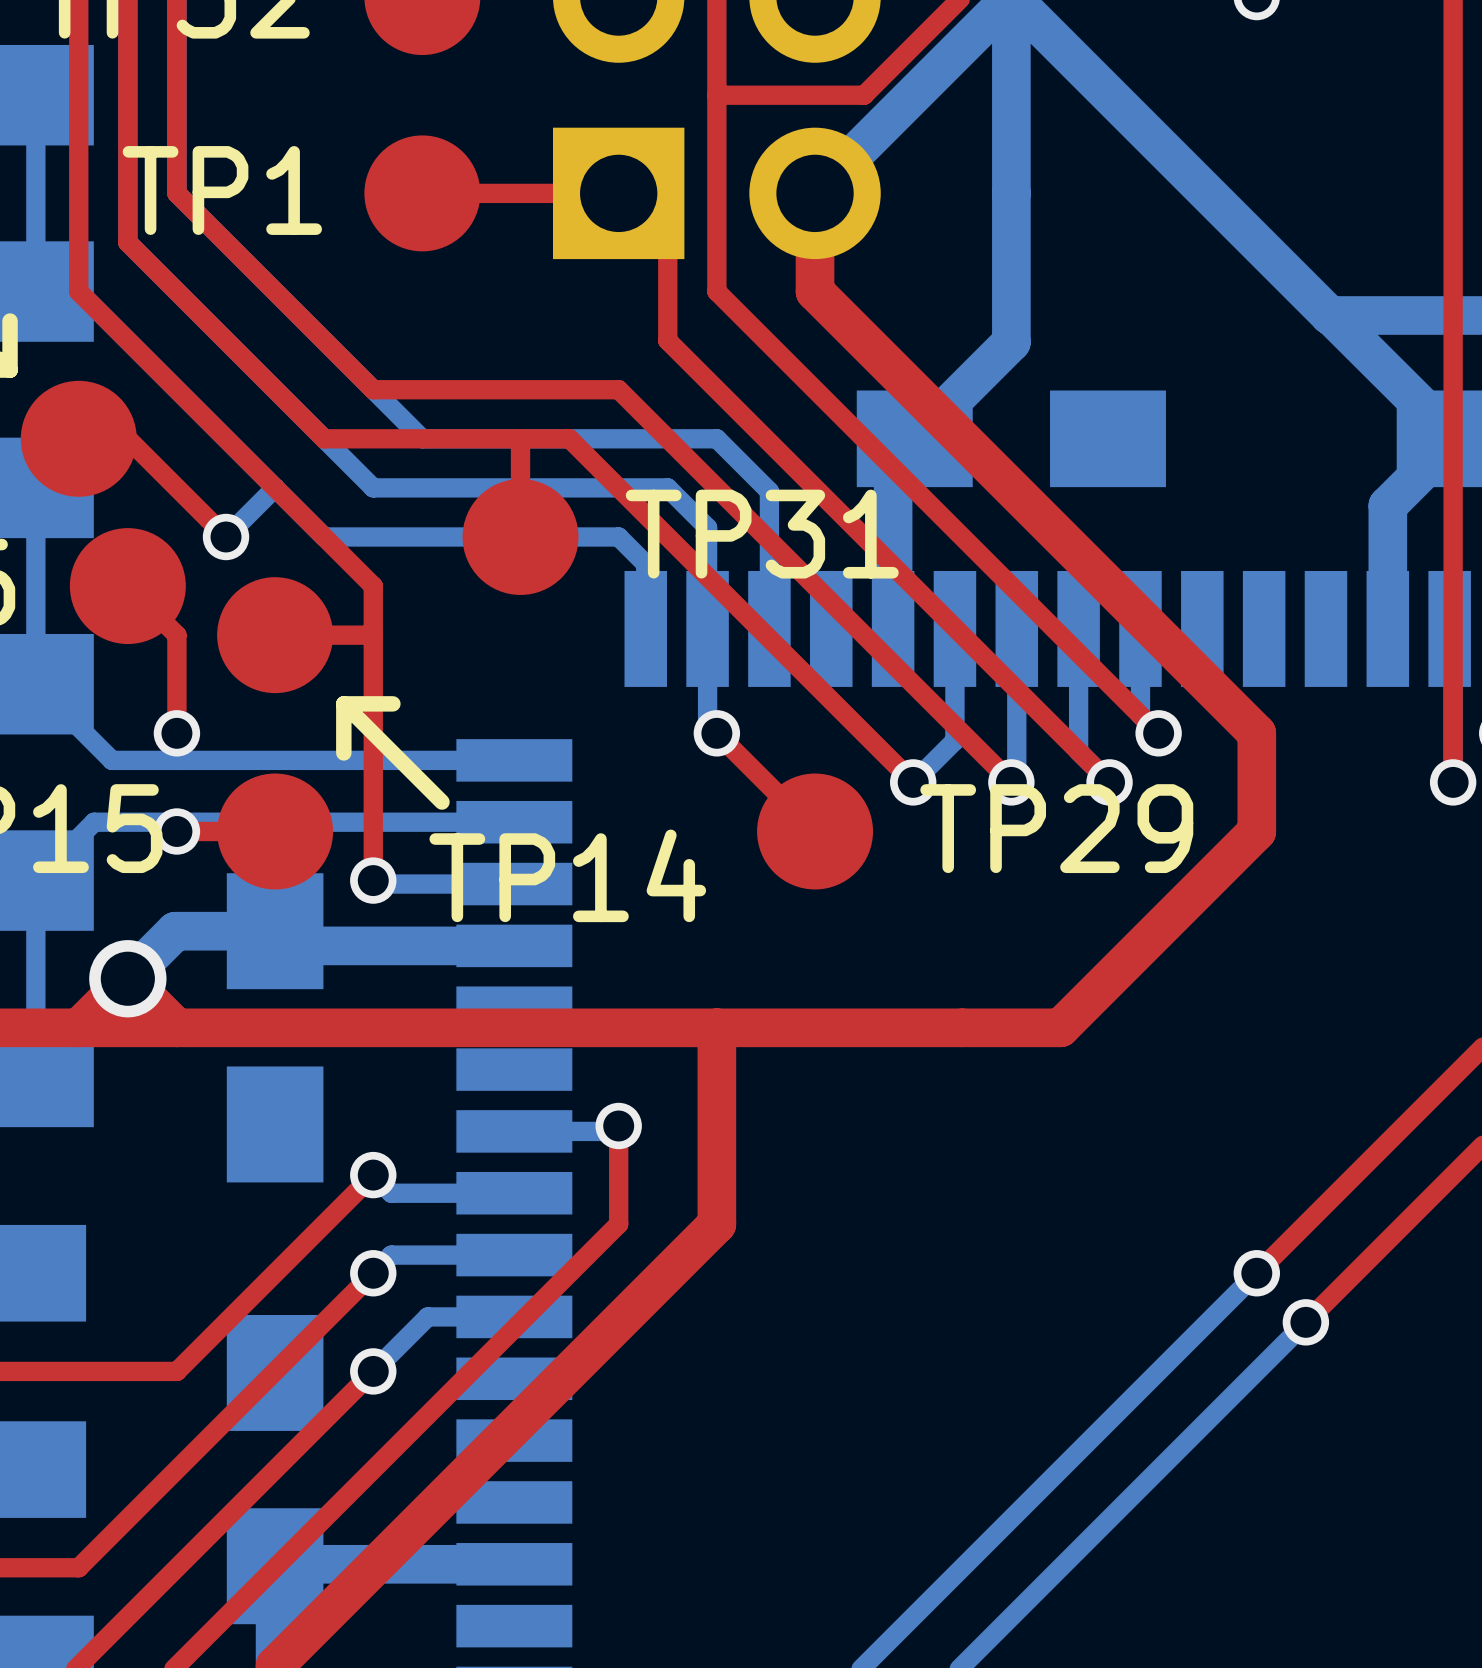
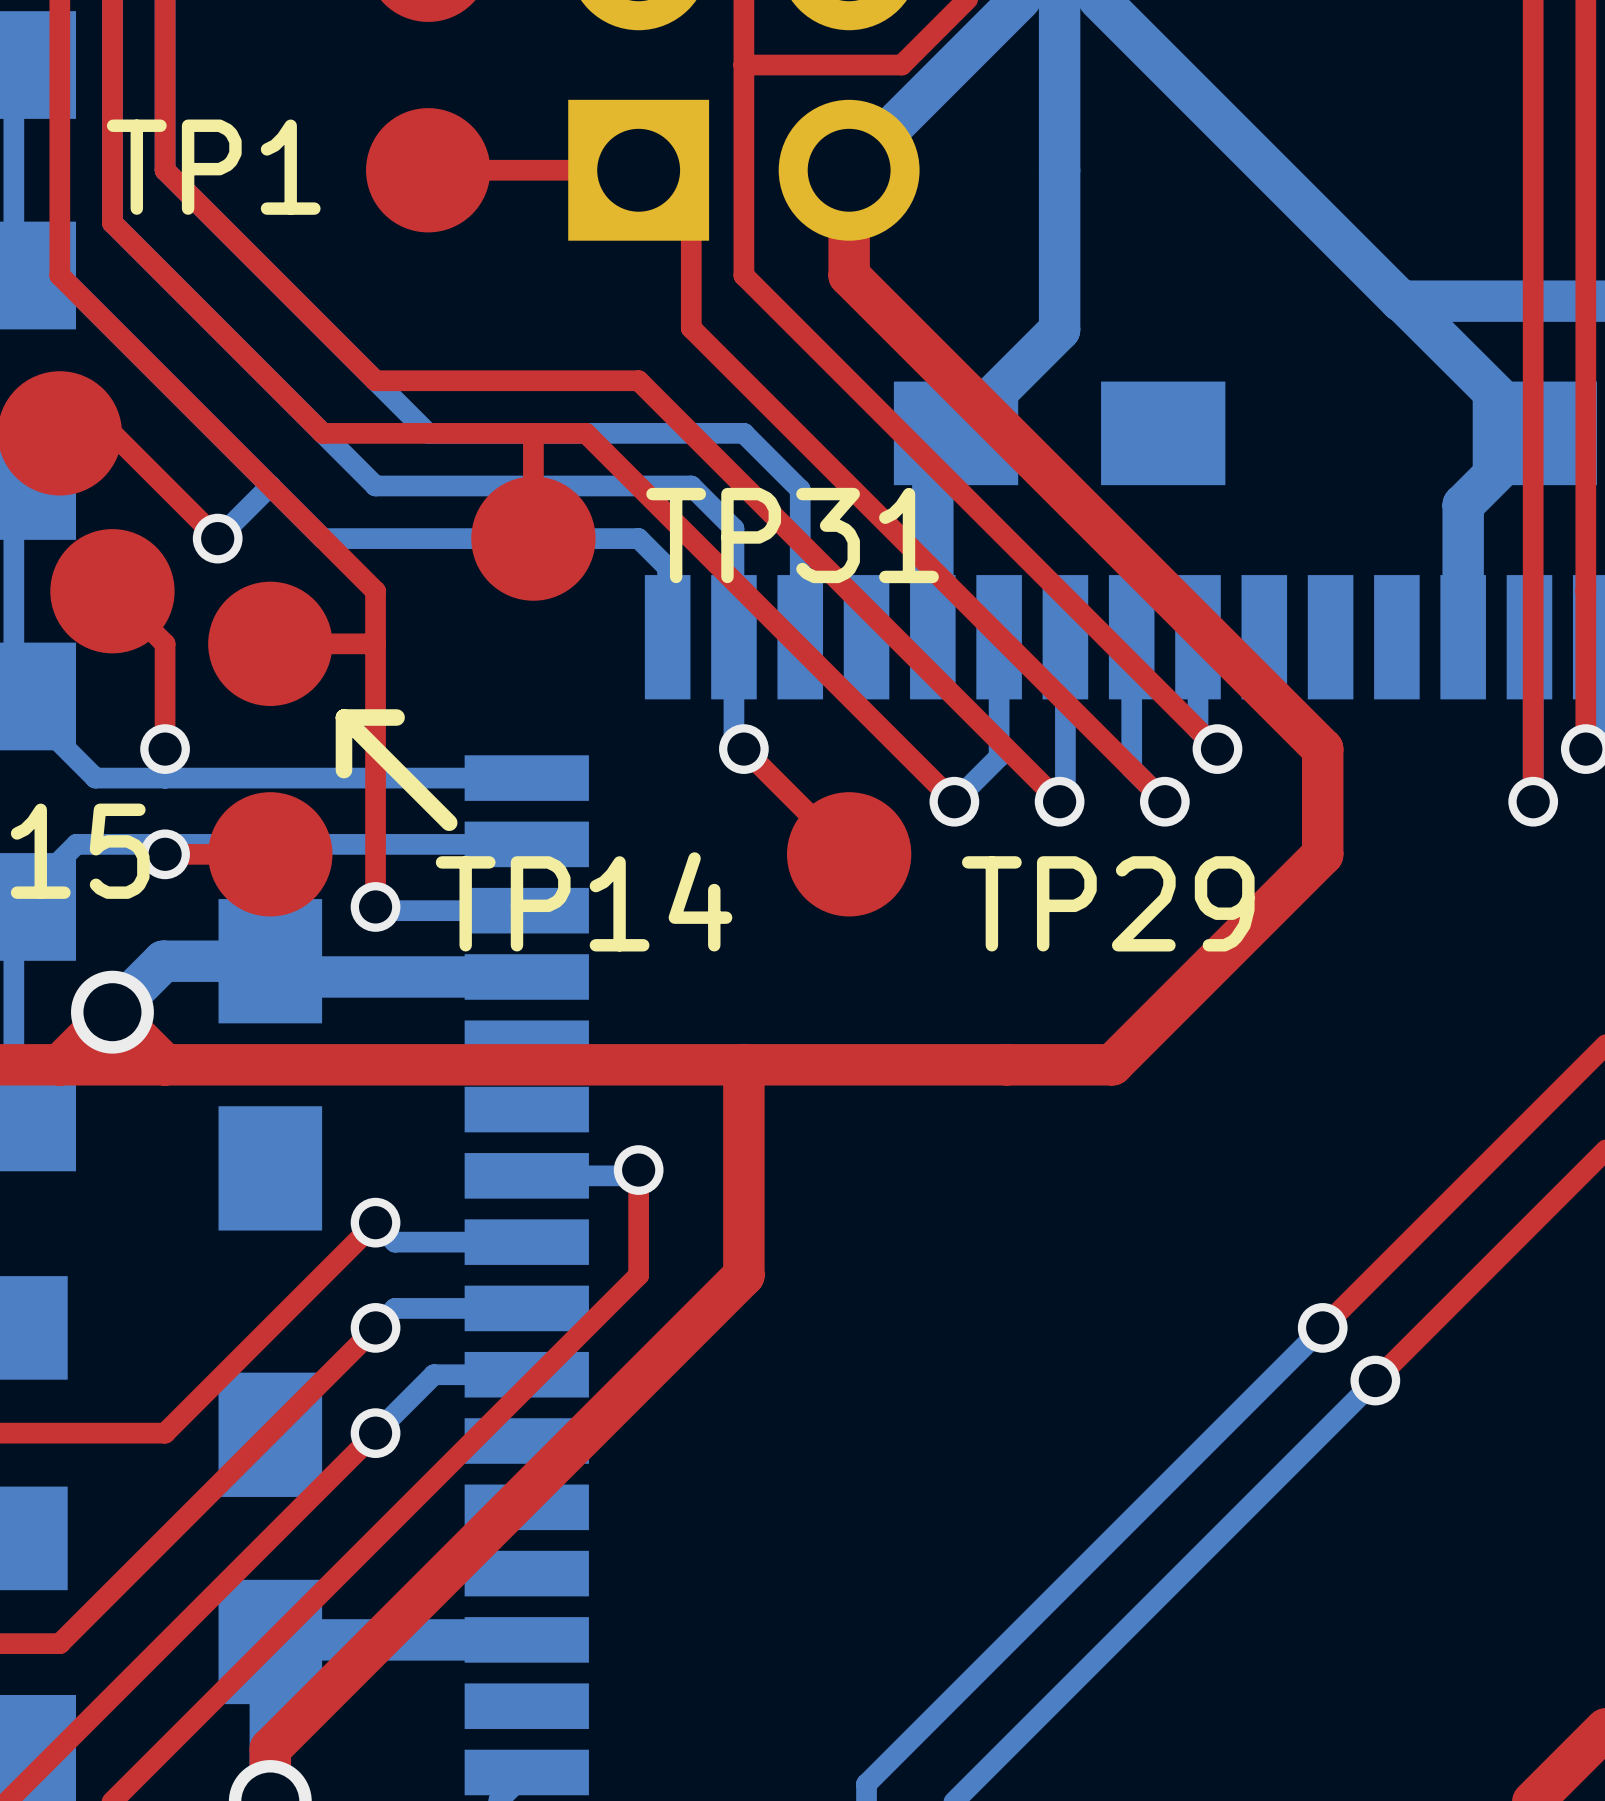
TP29 name position: TP29 (1056, 828) -> TP29 (1108, 903)

